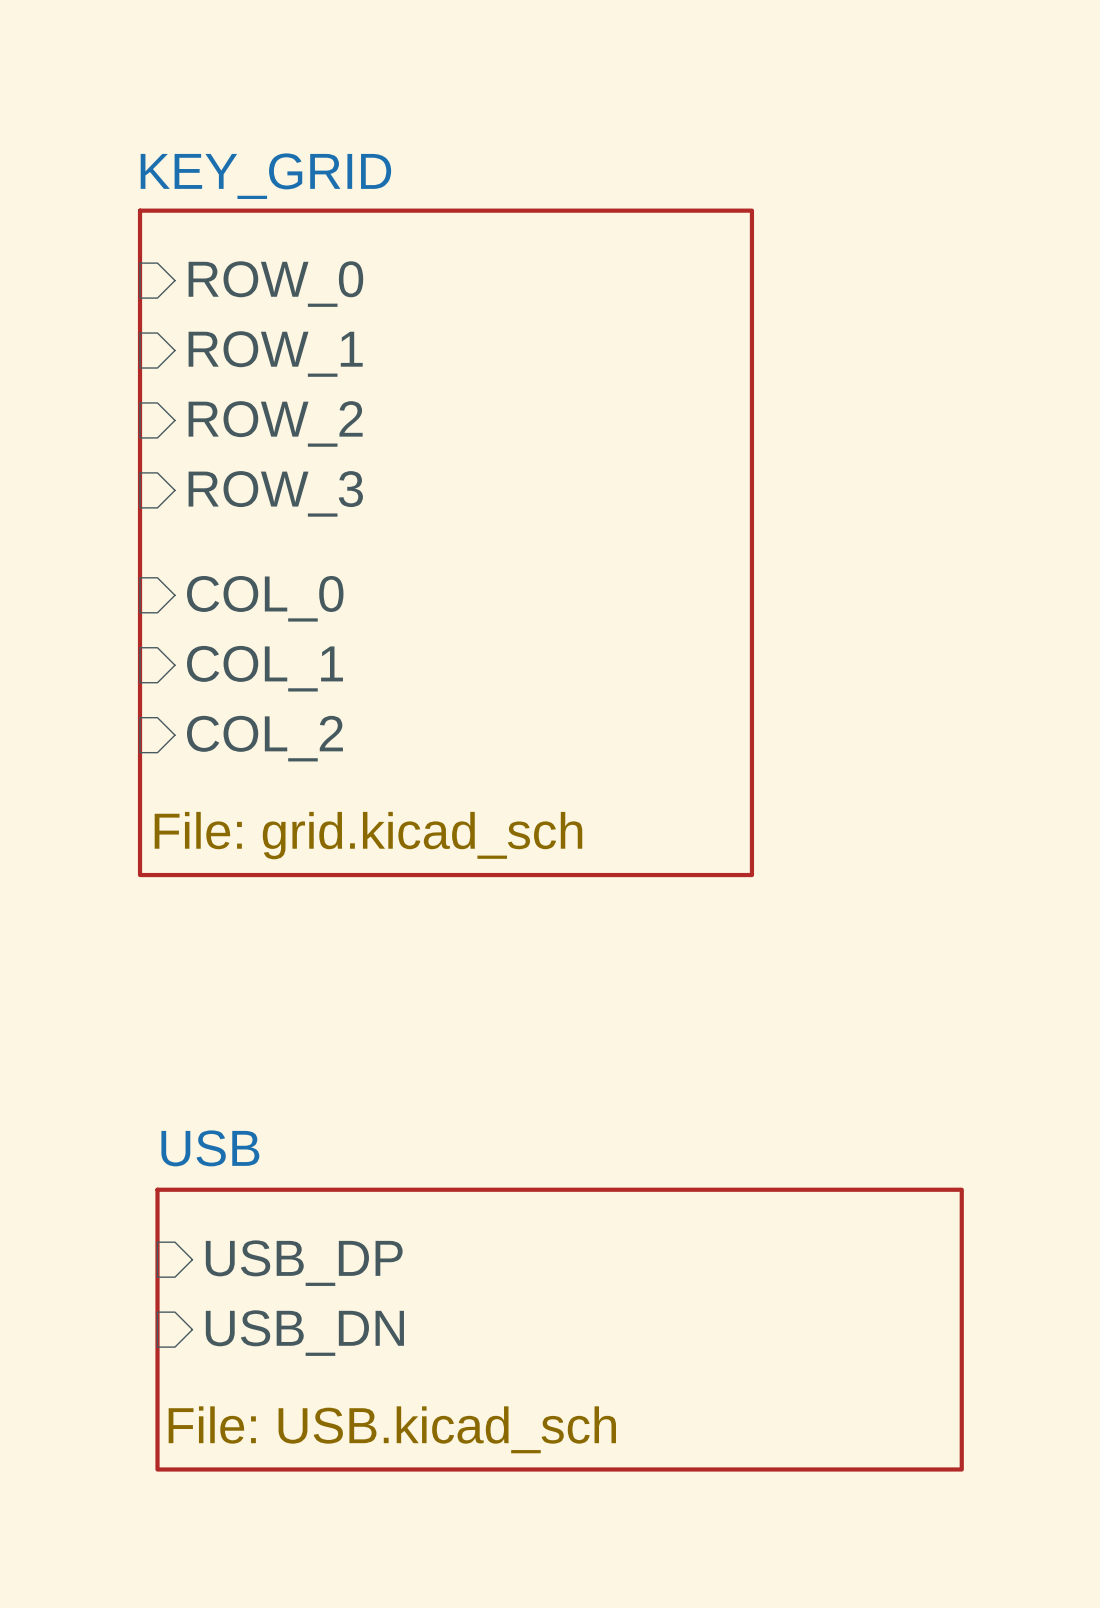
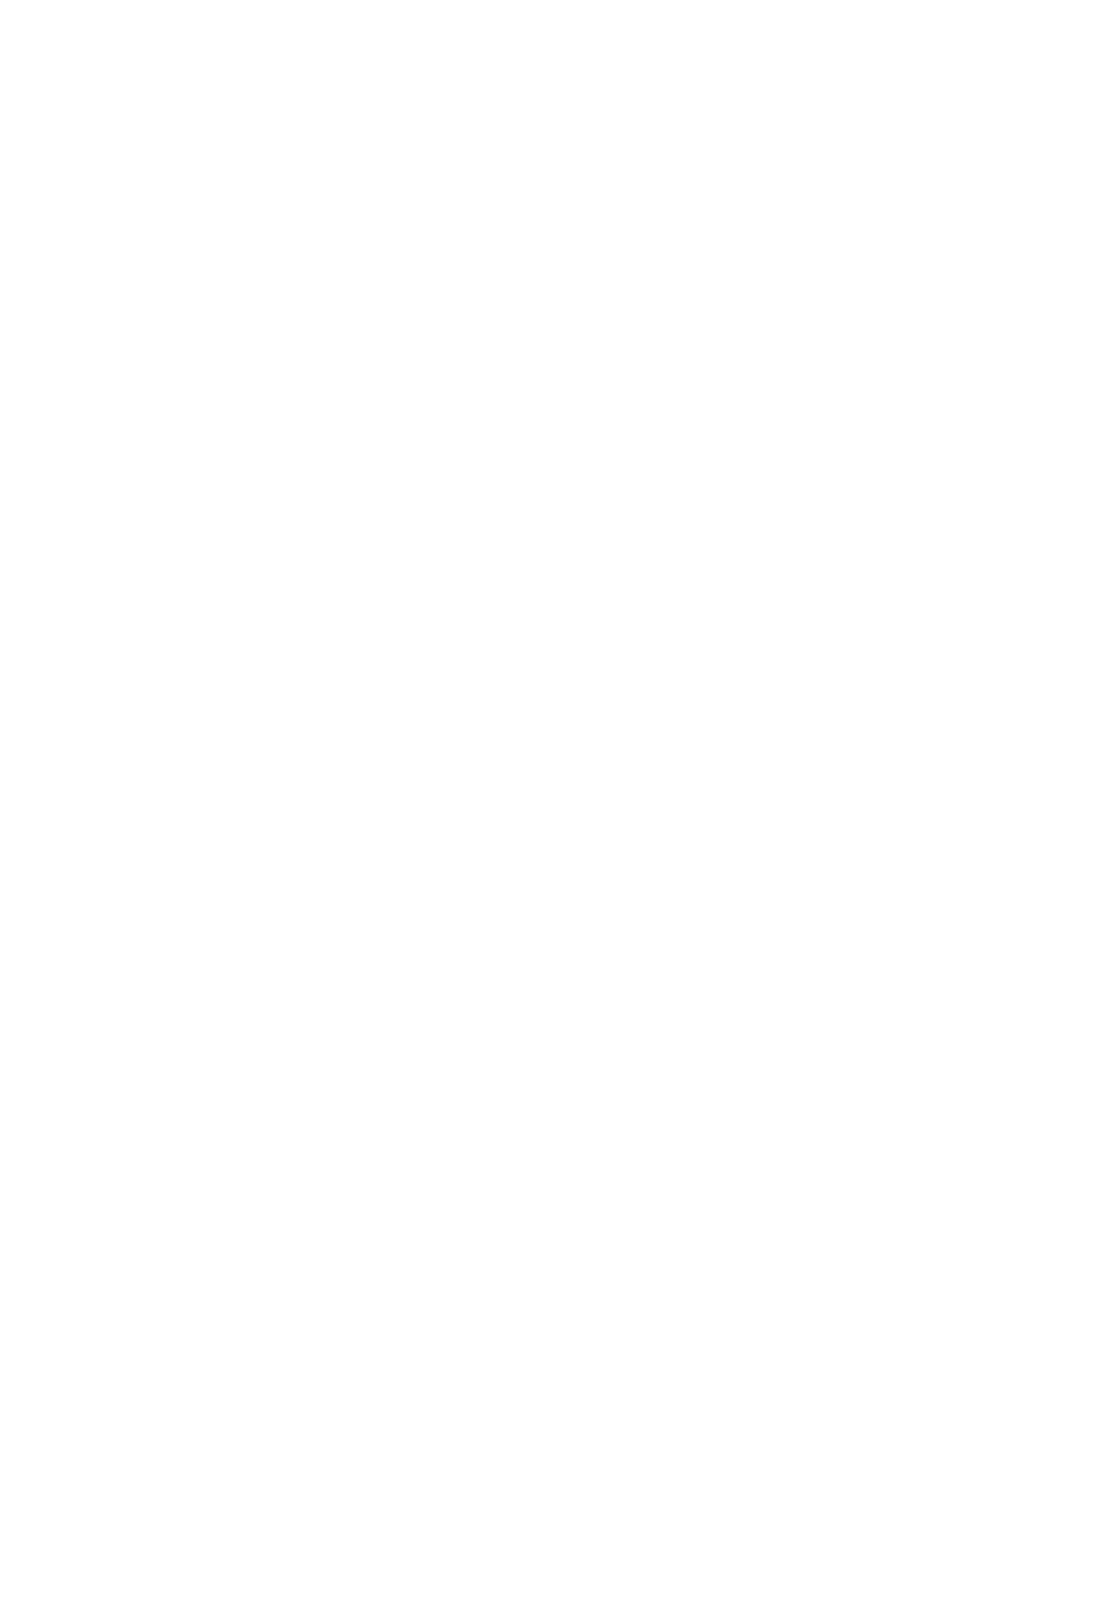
sheet pin: ROW_0 (275, 284) -> none
sheet pin: ROW_1 (275, 354) -> none
sheet pin: ROW_2 (275, 423) -> none
sheet pin: ROW_3 (275, 493) -> none
sheet KEY_GRID: File: grid.kicad_sch (445, 542) -> none
sheet pin: COL_0 (265, 598) -> none
sheet pin: COL_1 (265, 668) -> none
sheet pin: COL_2 (264, 738) -> none
sheet pin: USB_DP (304, 1263) -> none
sheet USB: File: USB.kicad_sch (559, 1329) -> none
sheet pin: USB_DN (304, 1333) -> none

